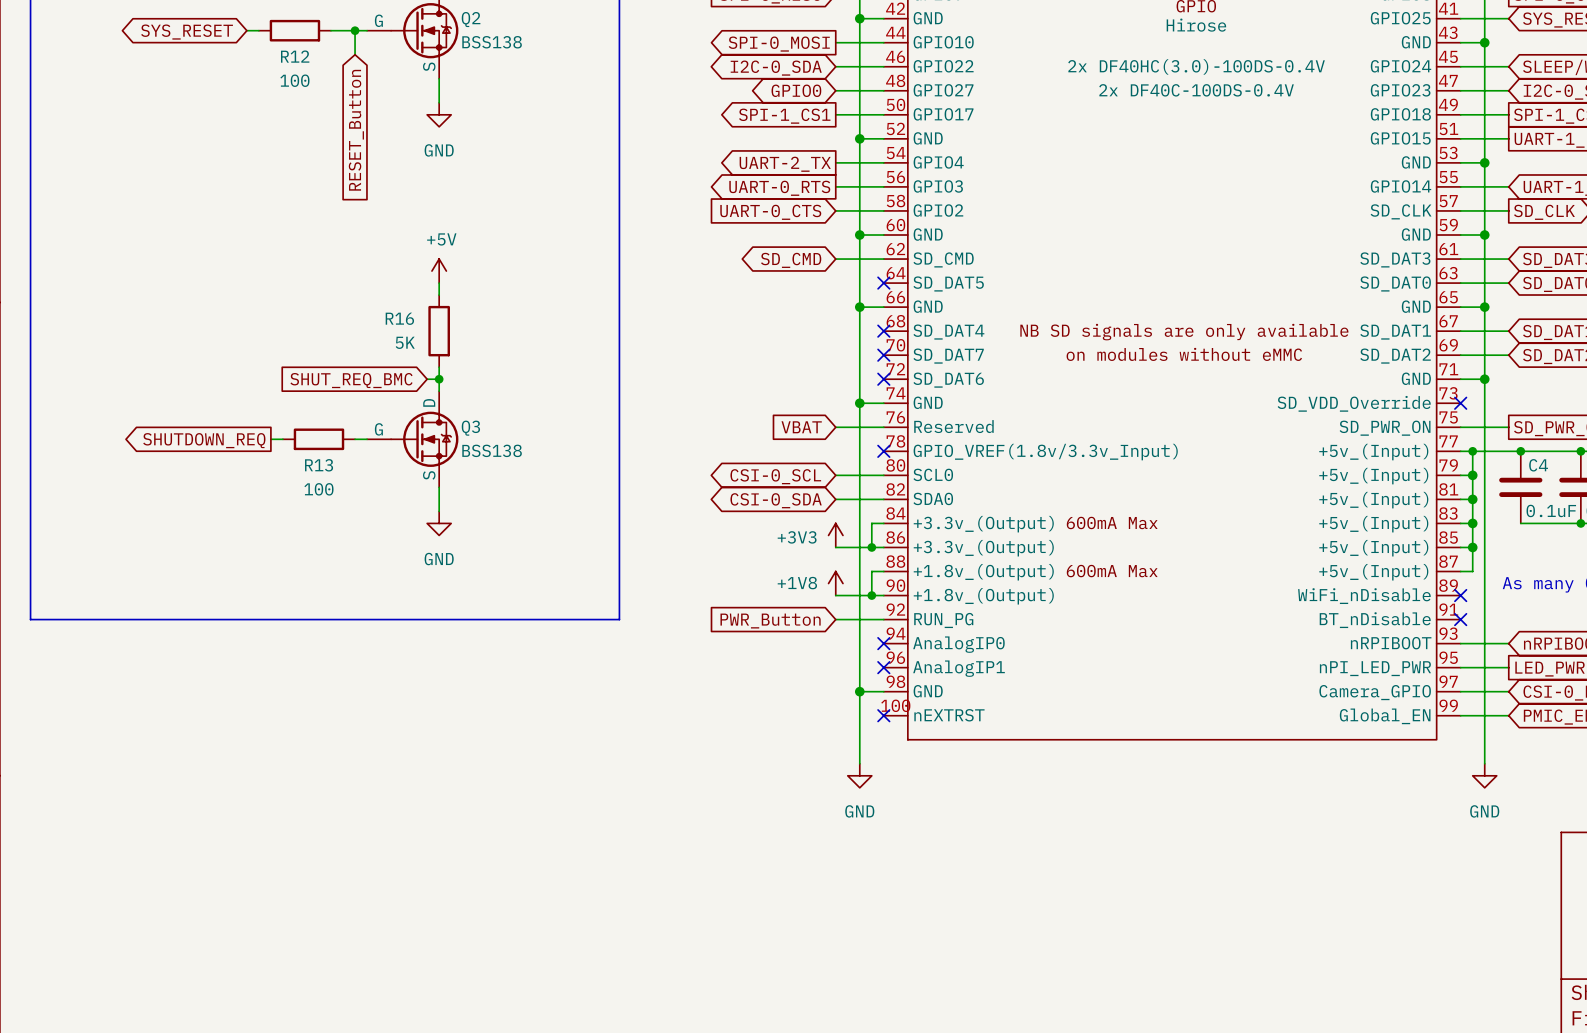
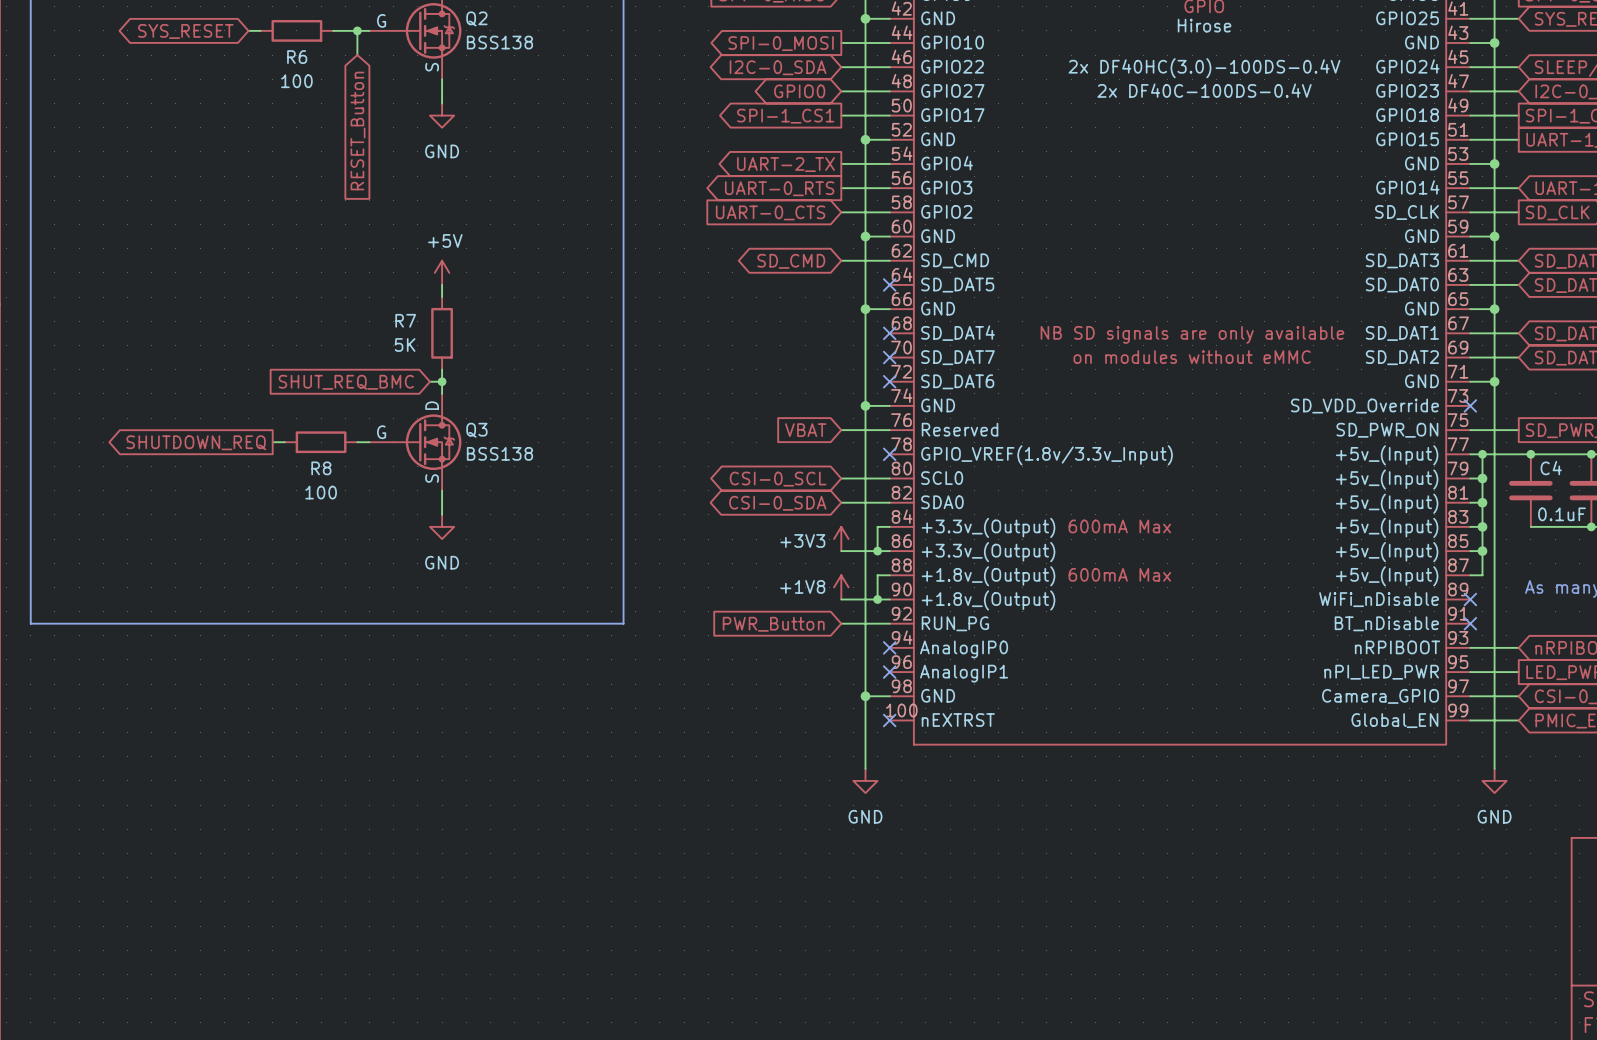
R12 name: R12 (295, 56) -> R6 (297, 57)
R16 name: R16 (399, 318) -> R7 (405, 320)
R13 name: R13 (319, 465) -> R8 (321, 468)

